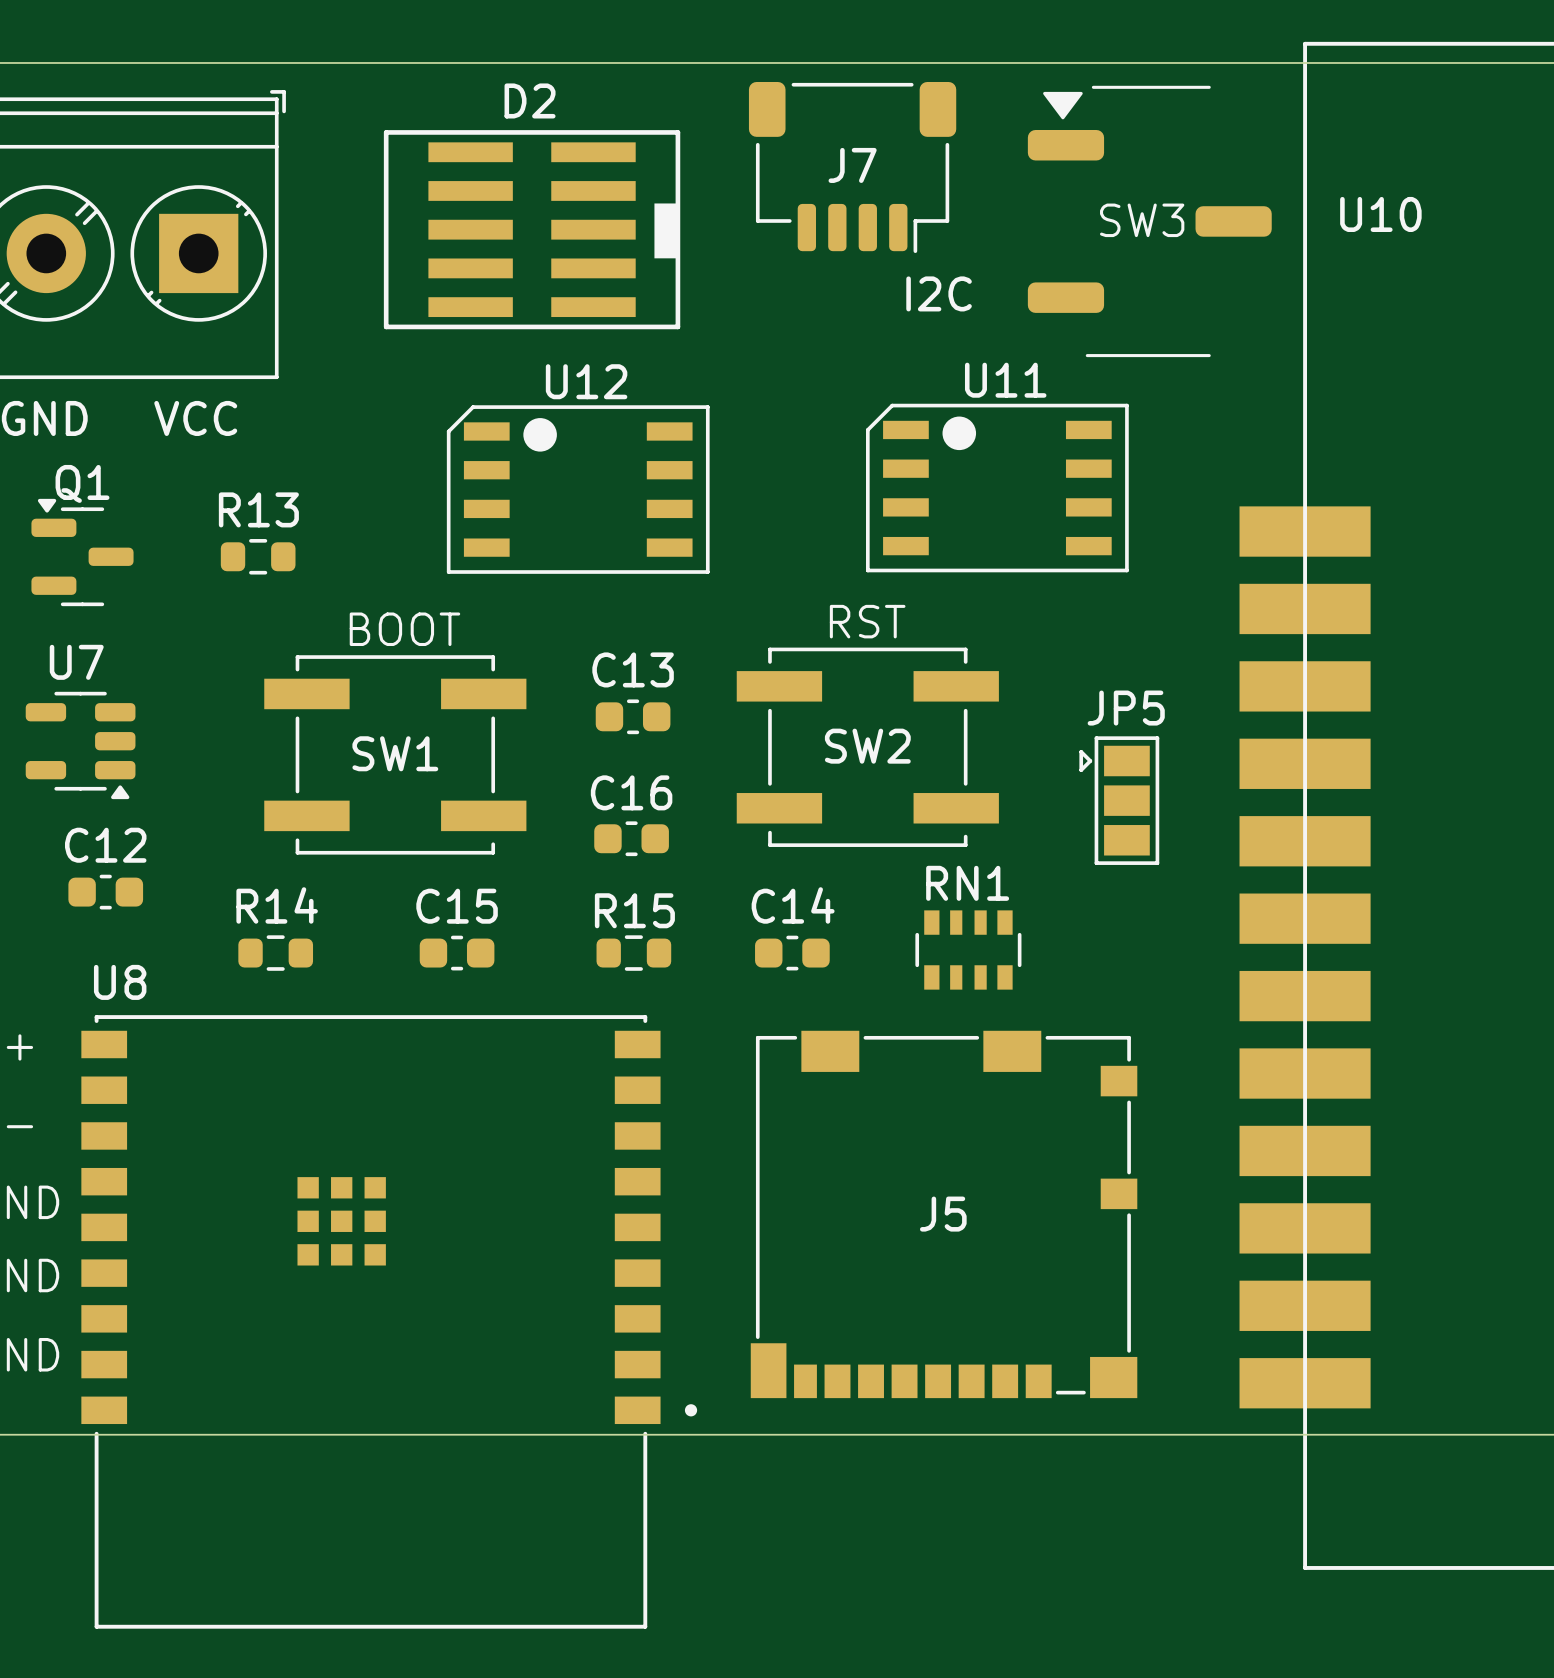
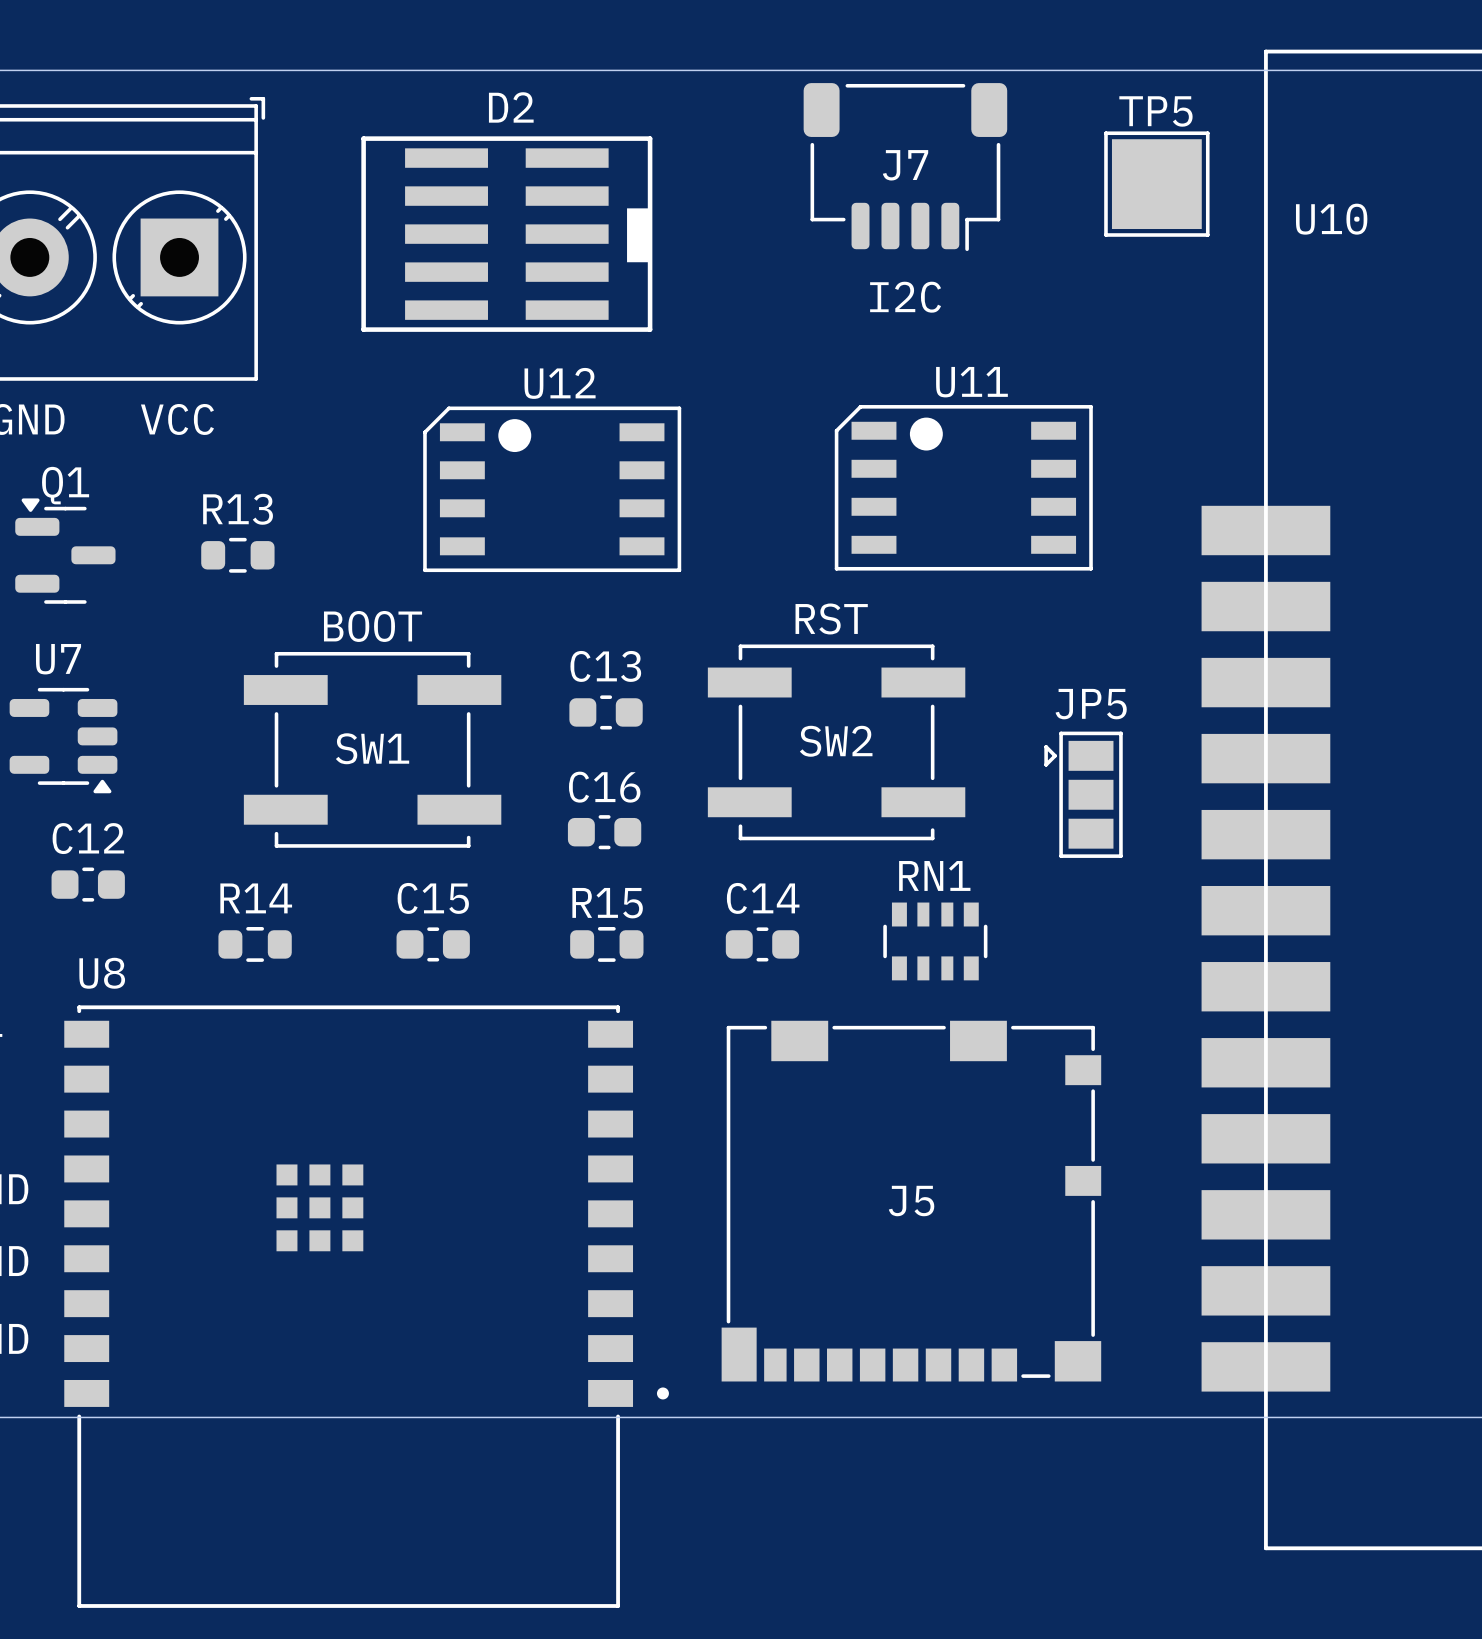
J7 position: (852, 167) -> (905, 167)
TP5: none -> (1156, 184)
SW3: (1149, 221) -> none

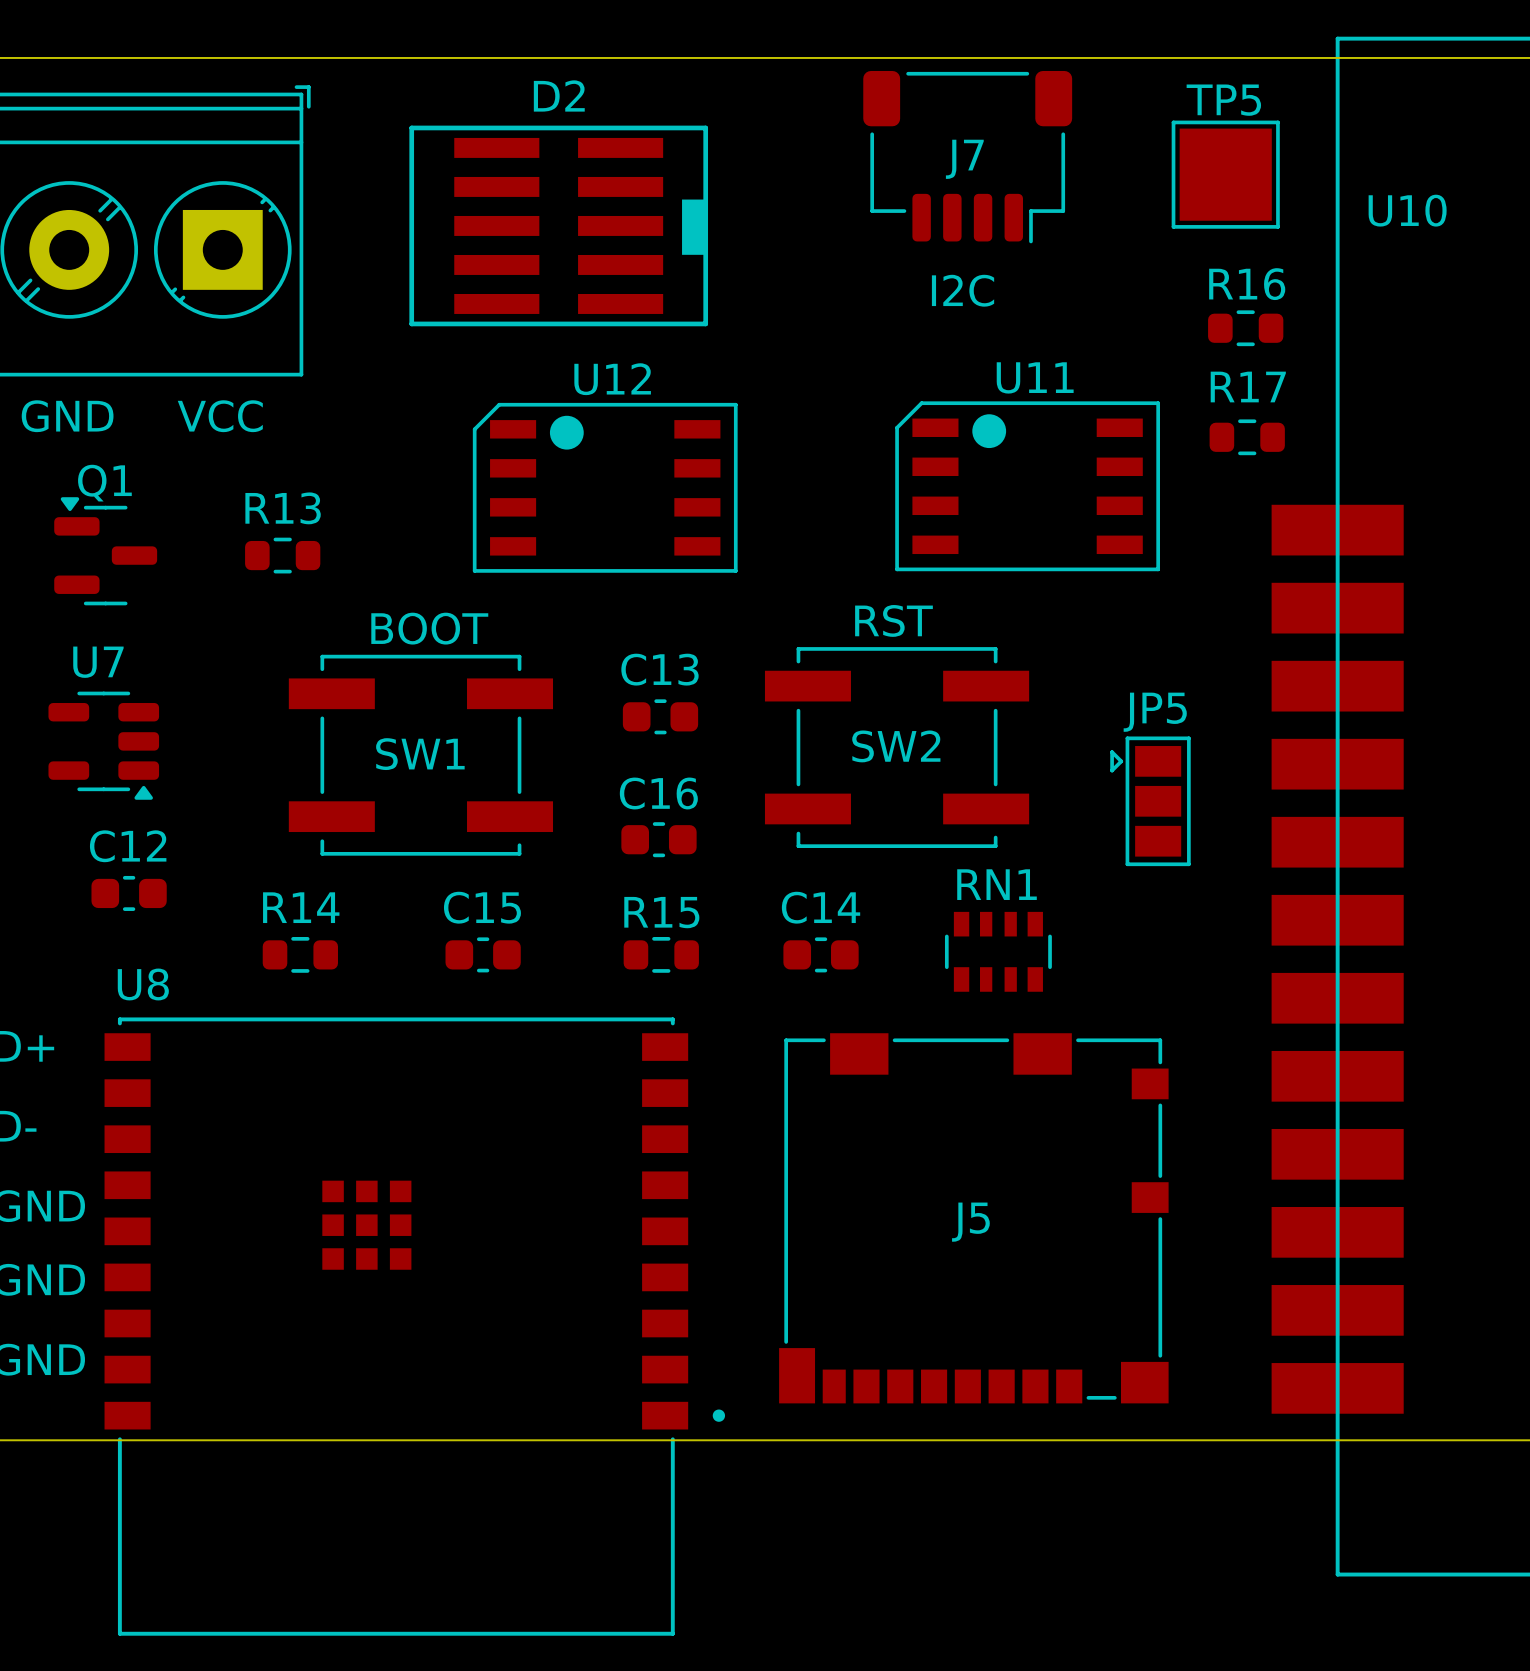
R16: none -> (1245, 328)
R17: none -> (1247, 437)

